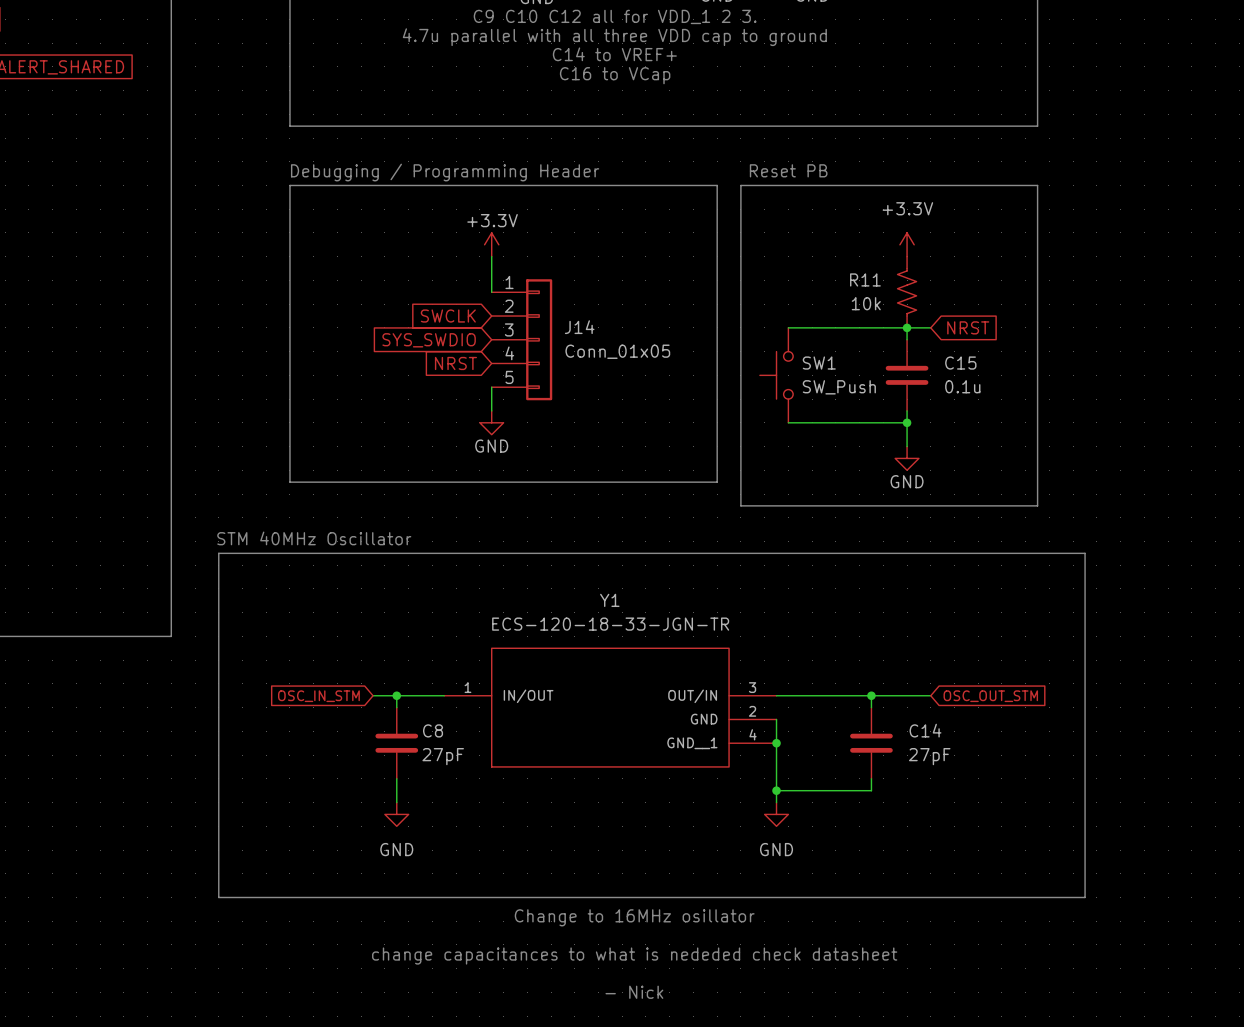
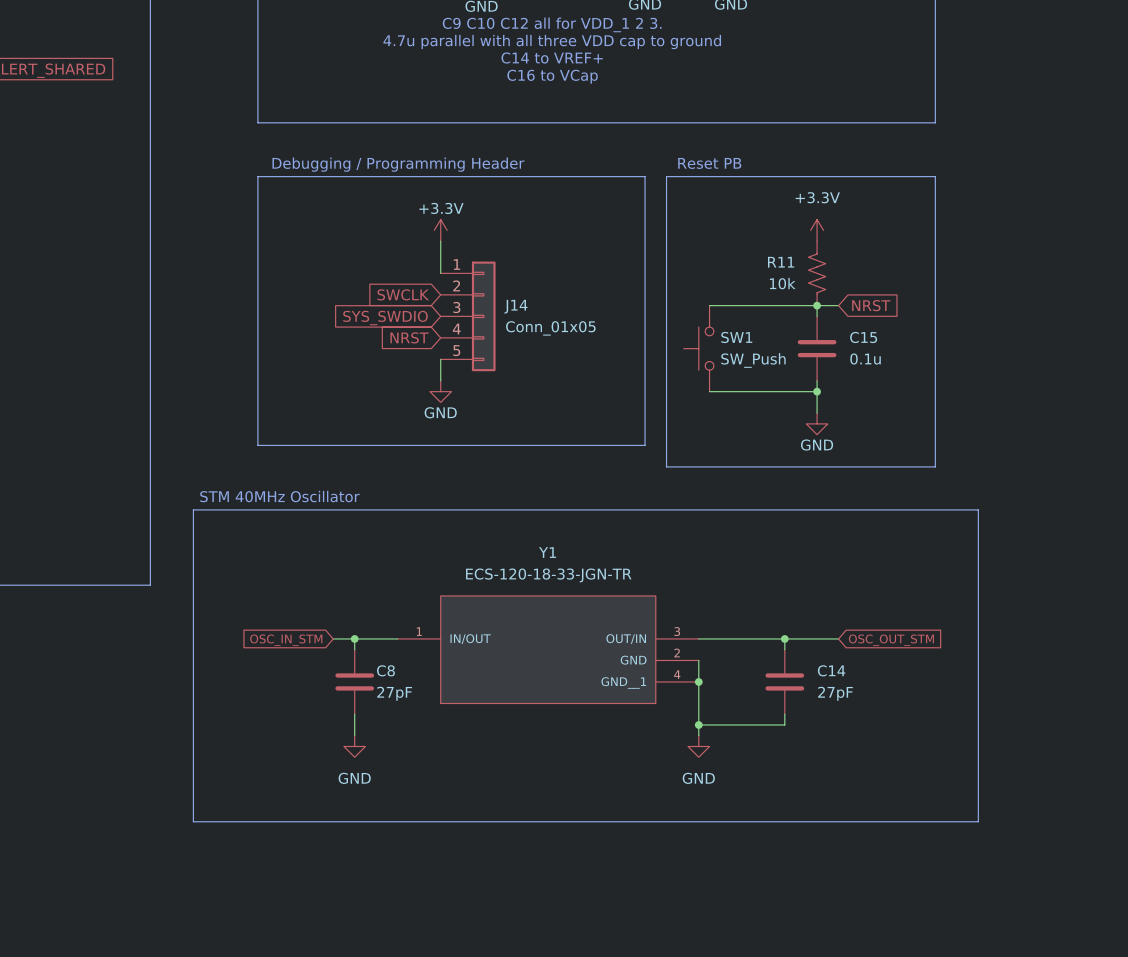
text: Change to 16MHz osillator (634, 917) -> none
text: change capacitances to what is nededed check datasheet (634, 956) -> none
text: - Nick (634, 992) -> none

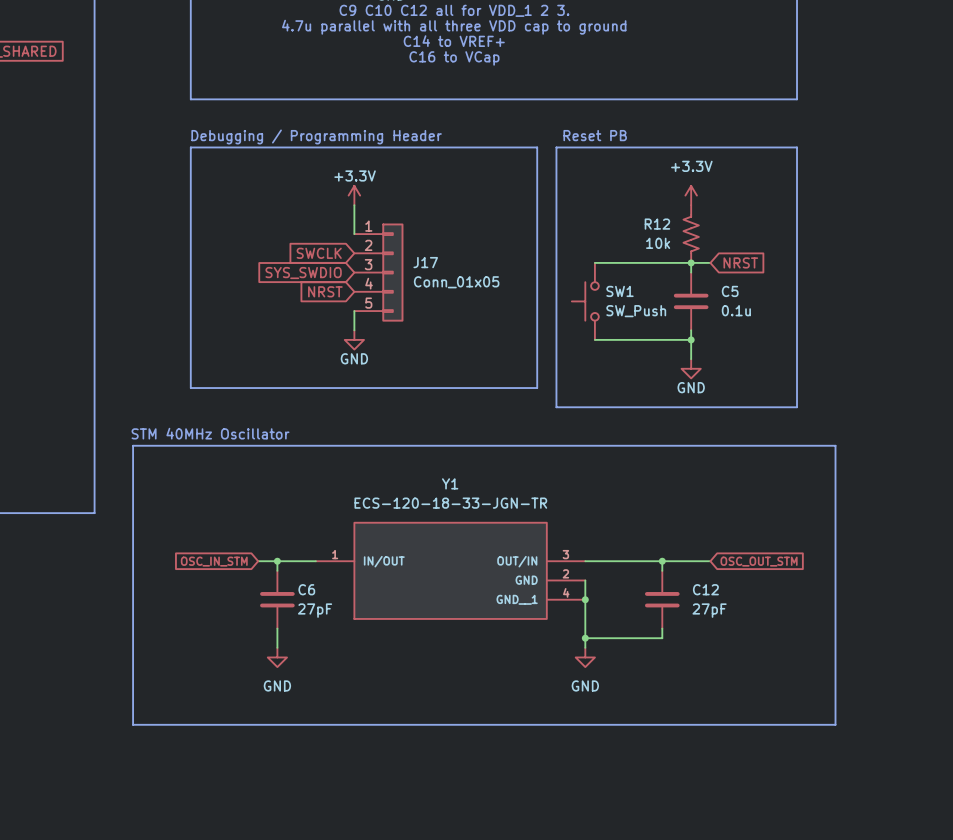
R11 name: R11 (781, 262) -> R12 (657, 224)
J14 name: J14 (516, 306) -> J17 (425, 262)
C15 name: C15 (863, 337) -> C5 (730, 291)
C8 name: C8 (385, 670) -> C6 (306, 589)
C14 name: C14 (831, 670) -> C12 (705, 589)

